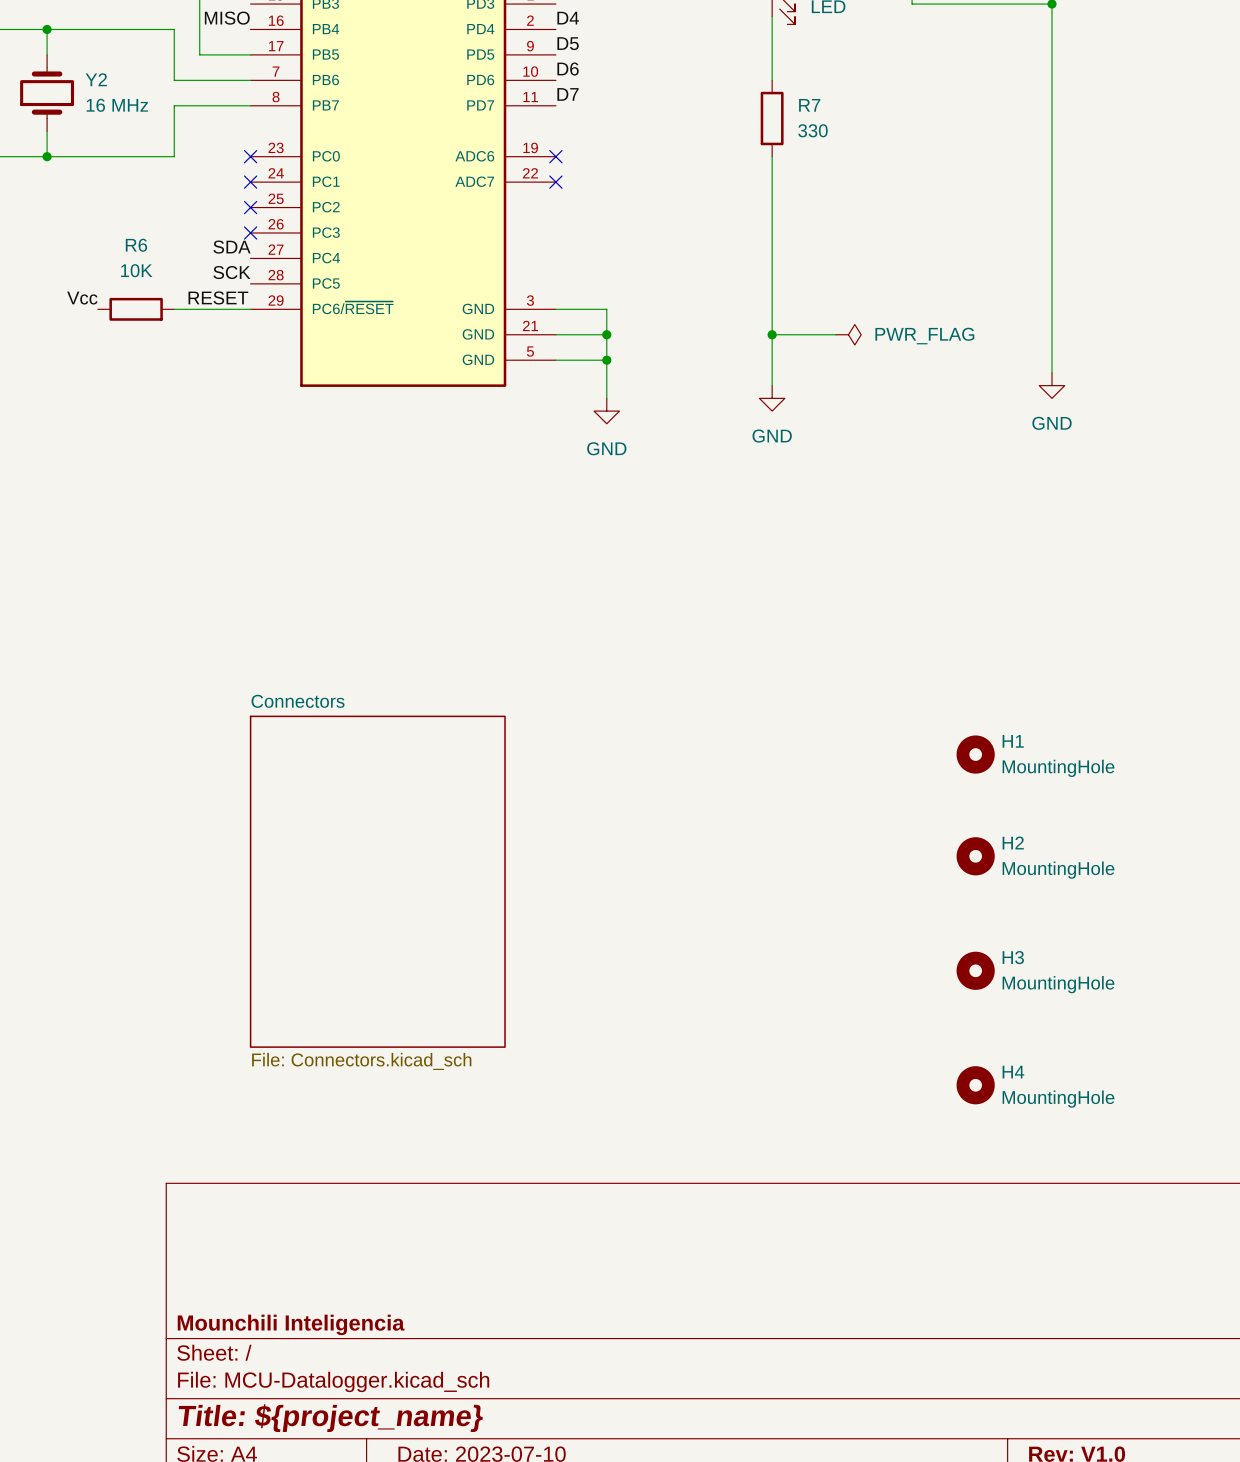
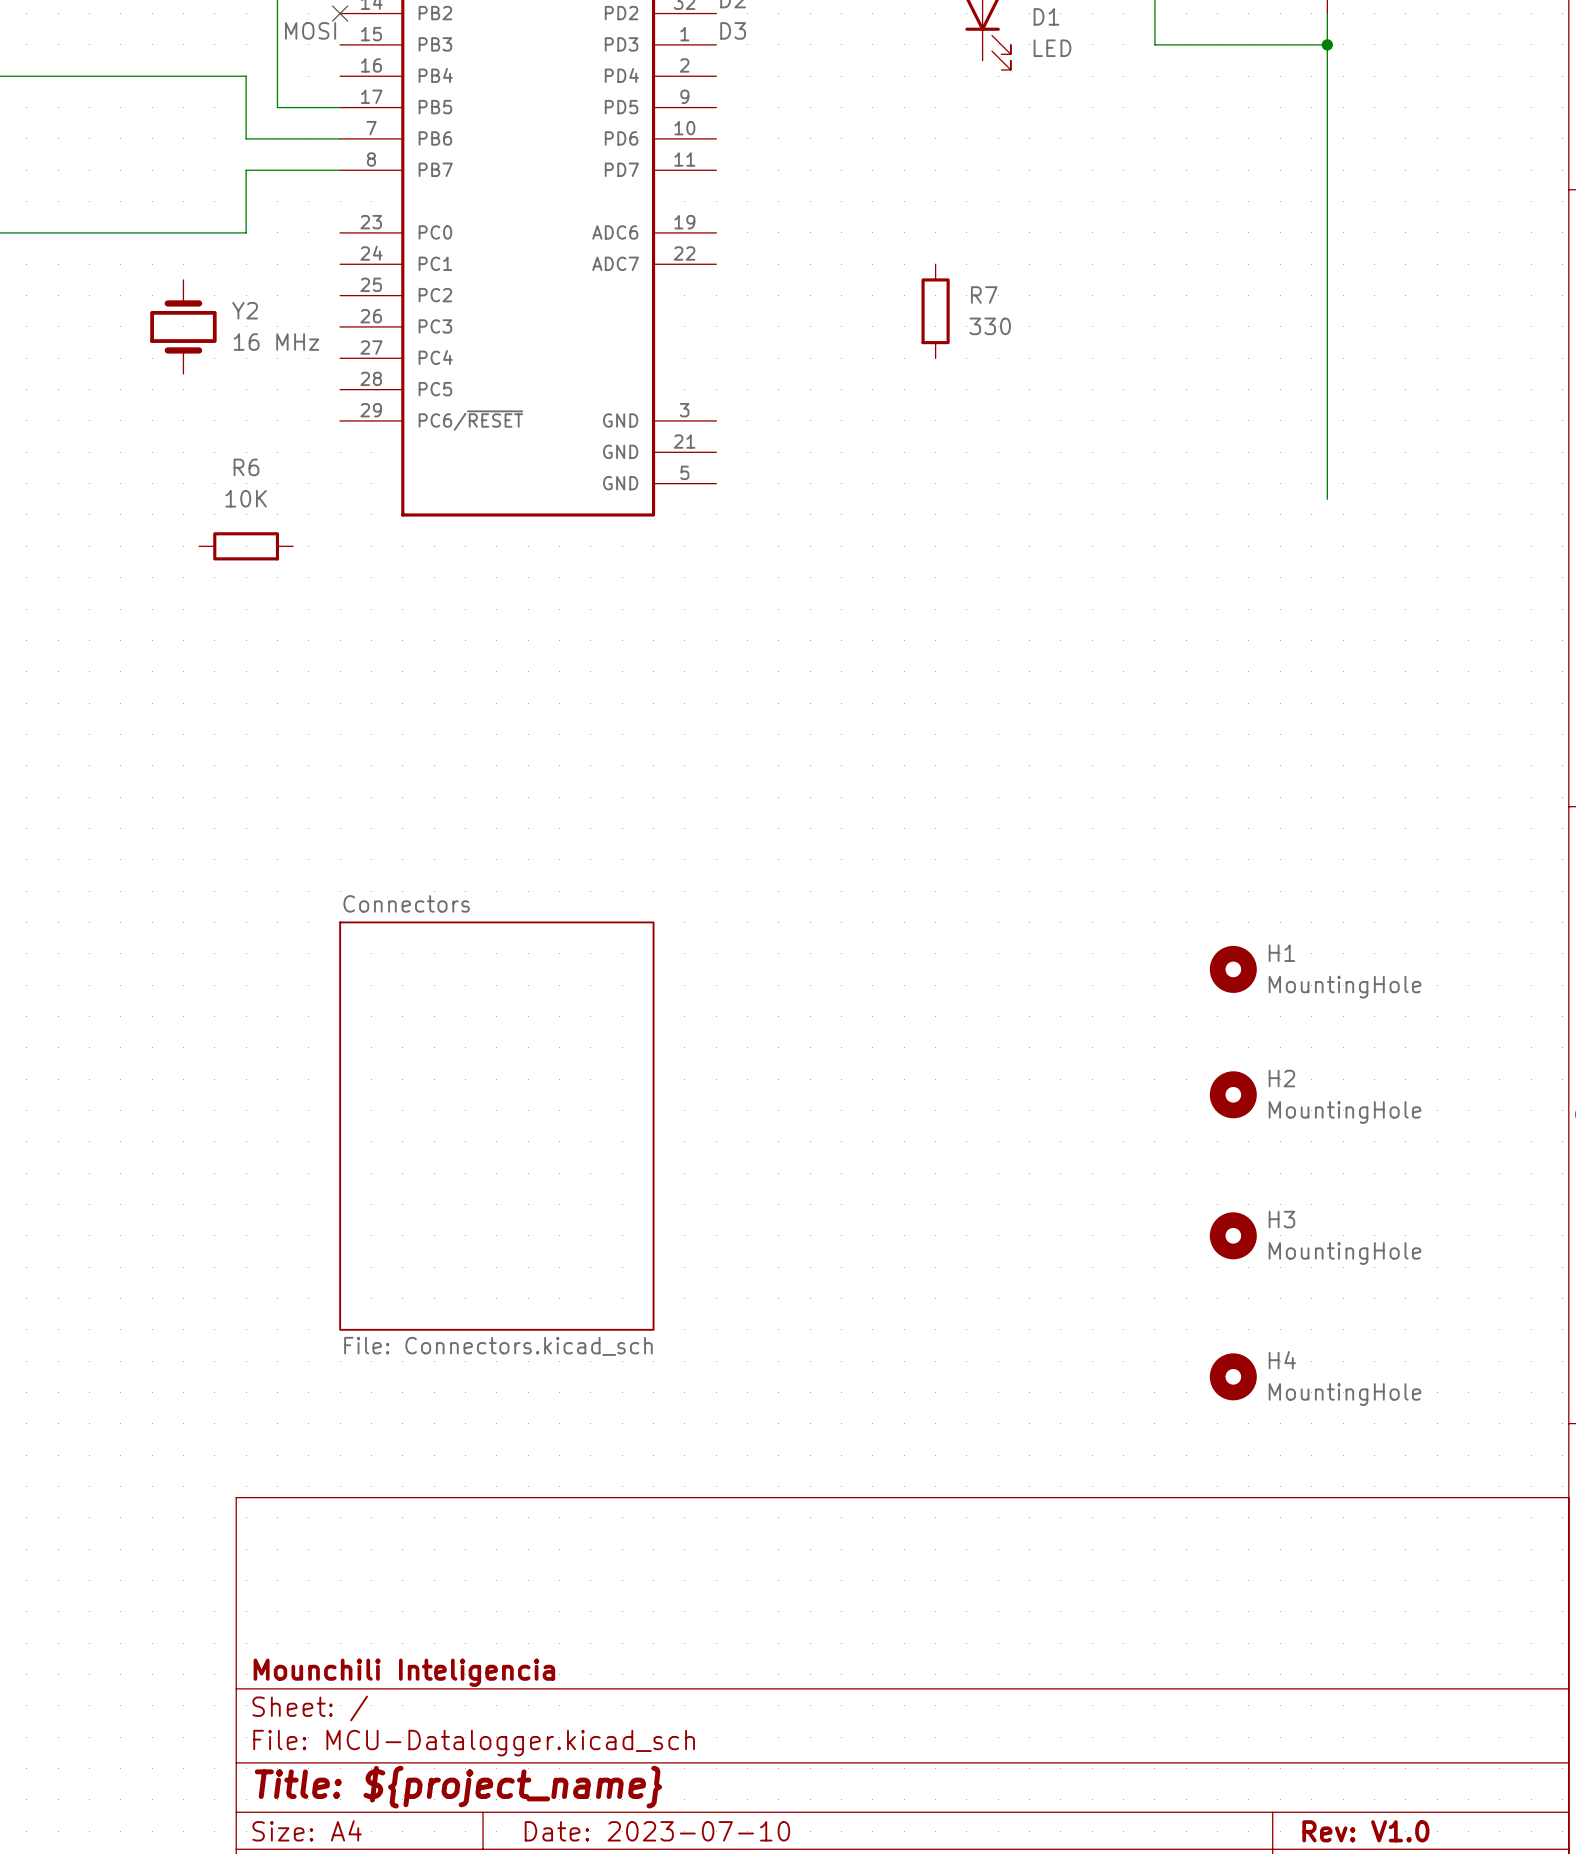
wire: (772, 16) (772, 80) -> none
label: MISO (227, 18) -> none
label: D4 (568, 18) -> none
wire: (47, 29) (47, 54) -> none
junction: (47, 29) -> none
label: D5 (568, 43) -> none
label: D6 (568, 69) -> none
Y2 position: (47, 93) -> (183, 326)
label: D7 (568, 94) -> none
R7 position: (772, 118) -> (935, 311)
wire: (47, 131) (47, 156) -> none
junction: (47, 156) -> none
no-connect mark: (250, 156) -> none
no-connect mark: (555, 156) -> none
wire: (772, 156) (772, 385) -> none
no-connect mark: (250, 182) -> none
no-connect mark: (555, 182) -> none
no-connect mark: (250, 207) -> none
no-connect mark: (250, 233) -> none
label: SDA (231, 247) -> none
label: SCK (231, 272) -> none
label: RESET (218, 297) -> none
label: Vcc (82, 298) -> none
R6 position: (136, 309) -> (246, 546)
wire: (174, 309) (250, 309) -> none
wire: (555, 309) (606, 309) (606, 398) -> none
wire: (555, 334) (606, 334) -> none
junction: (606, 334) -> none
wire: (772, 334) (835, 334) -> none
junction: (772, 334) -> none
power symbol: PWR_FLAG (848, 334) -> none
wire: (555, 360) (606, 360) -> none
junction: (606, 360) -> none
power symbol: GND (1051, 385) -> none
power symbol: GND (772, 398) -> none
power symbol: GND (606, 411) -> none

